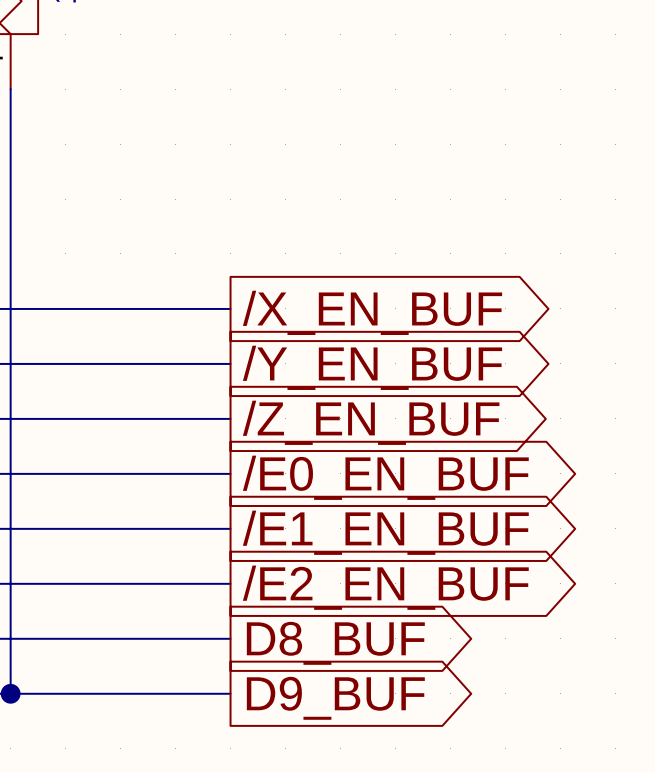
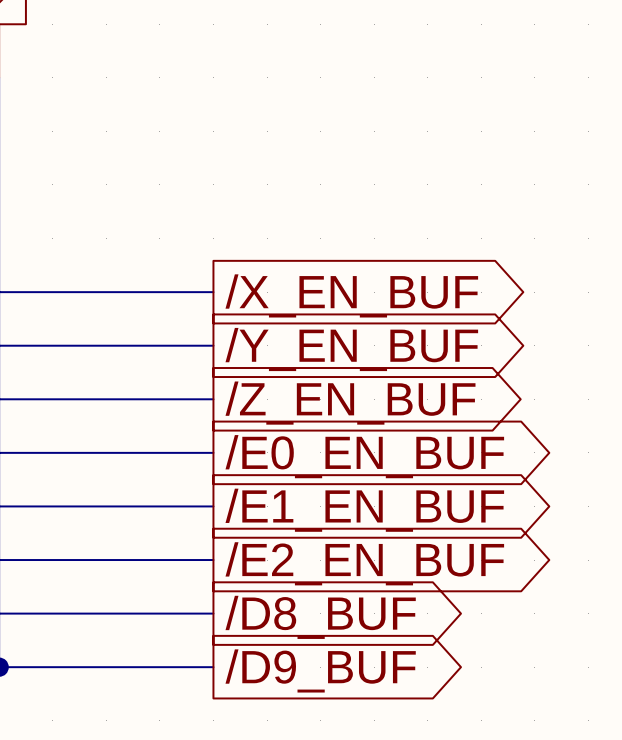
global label: D8_BUF (335, 643) -> /D8_BUF (320, 617)
global label: D9_BUF (335, 698) -> /D9_BUF (320, 670)

